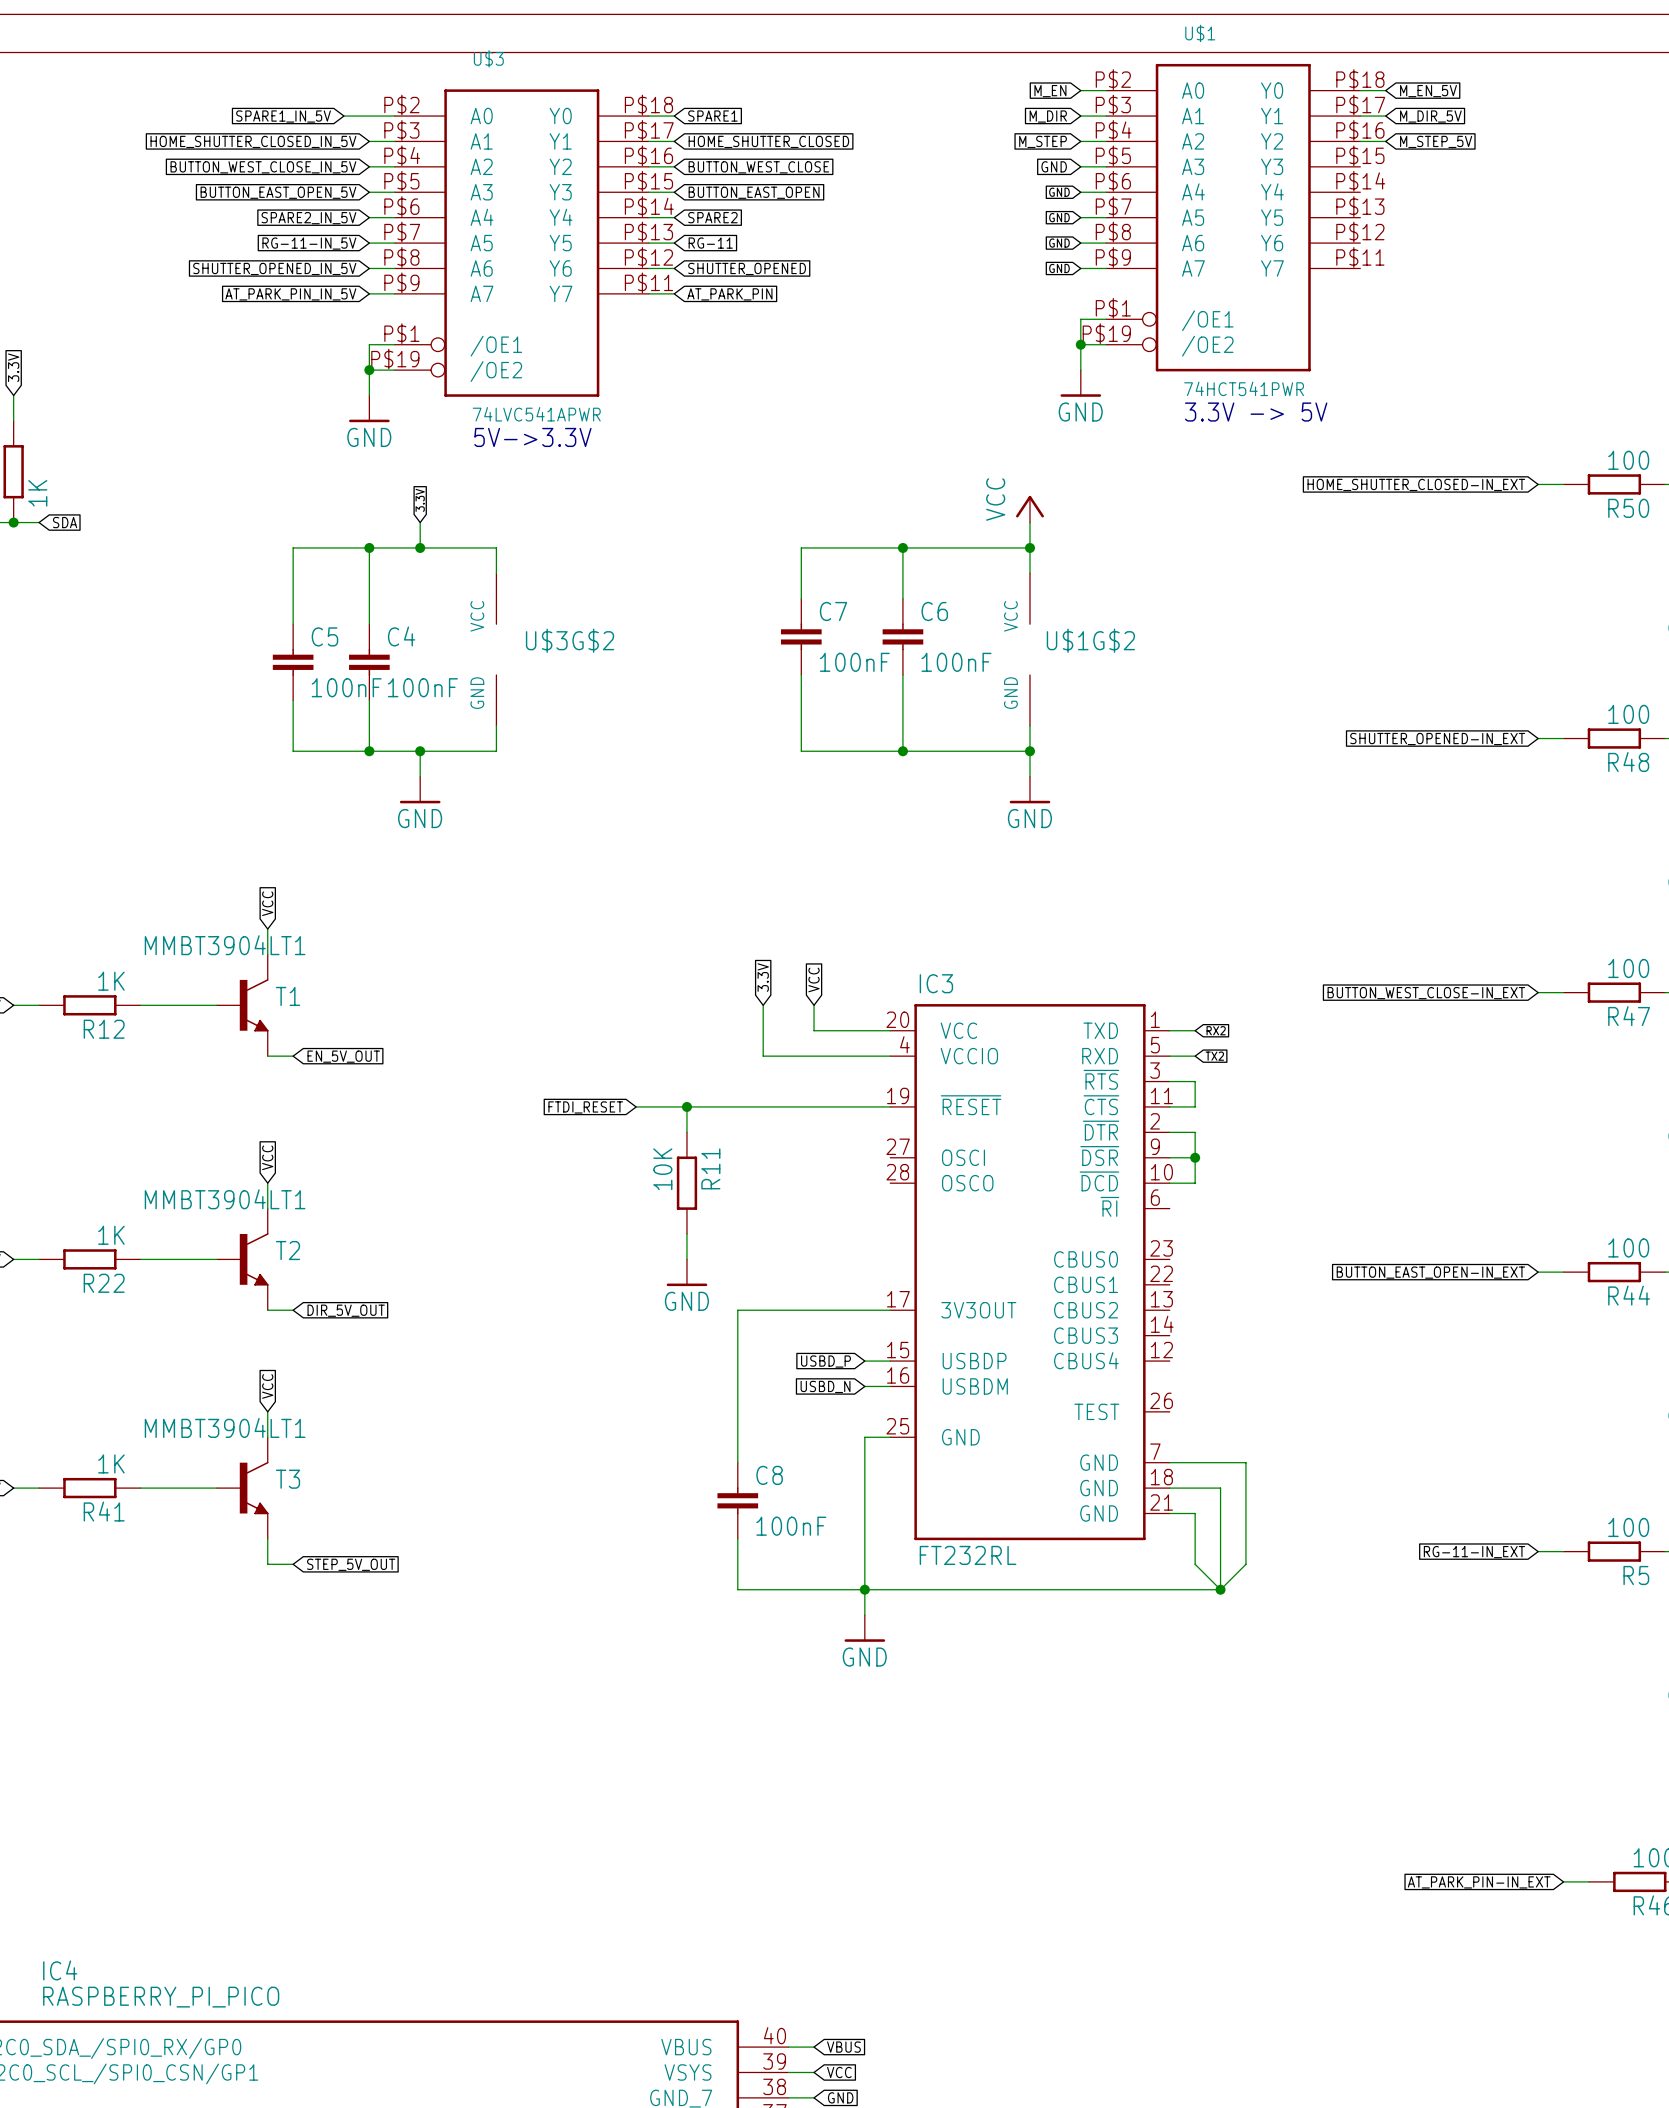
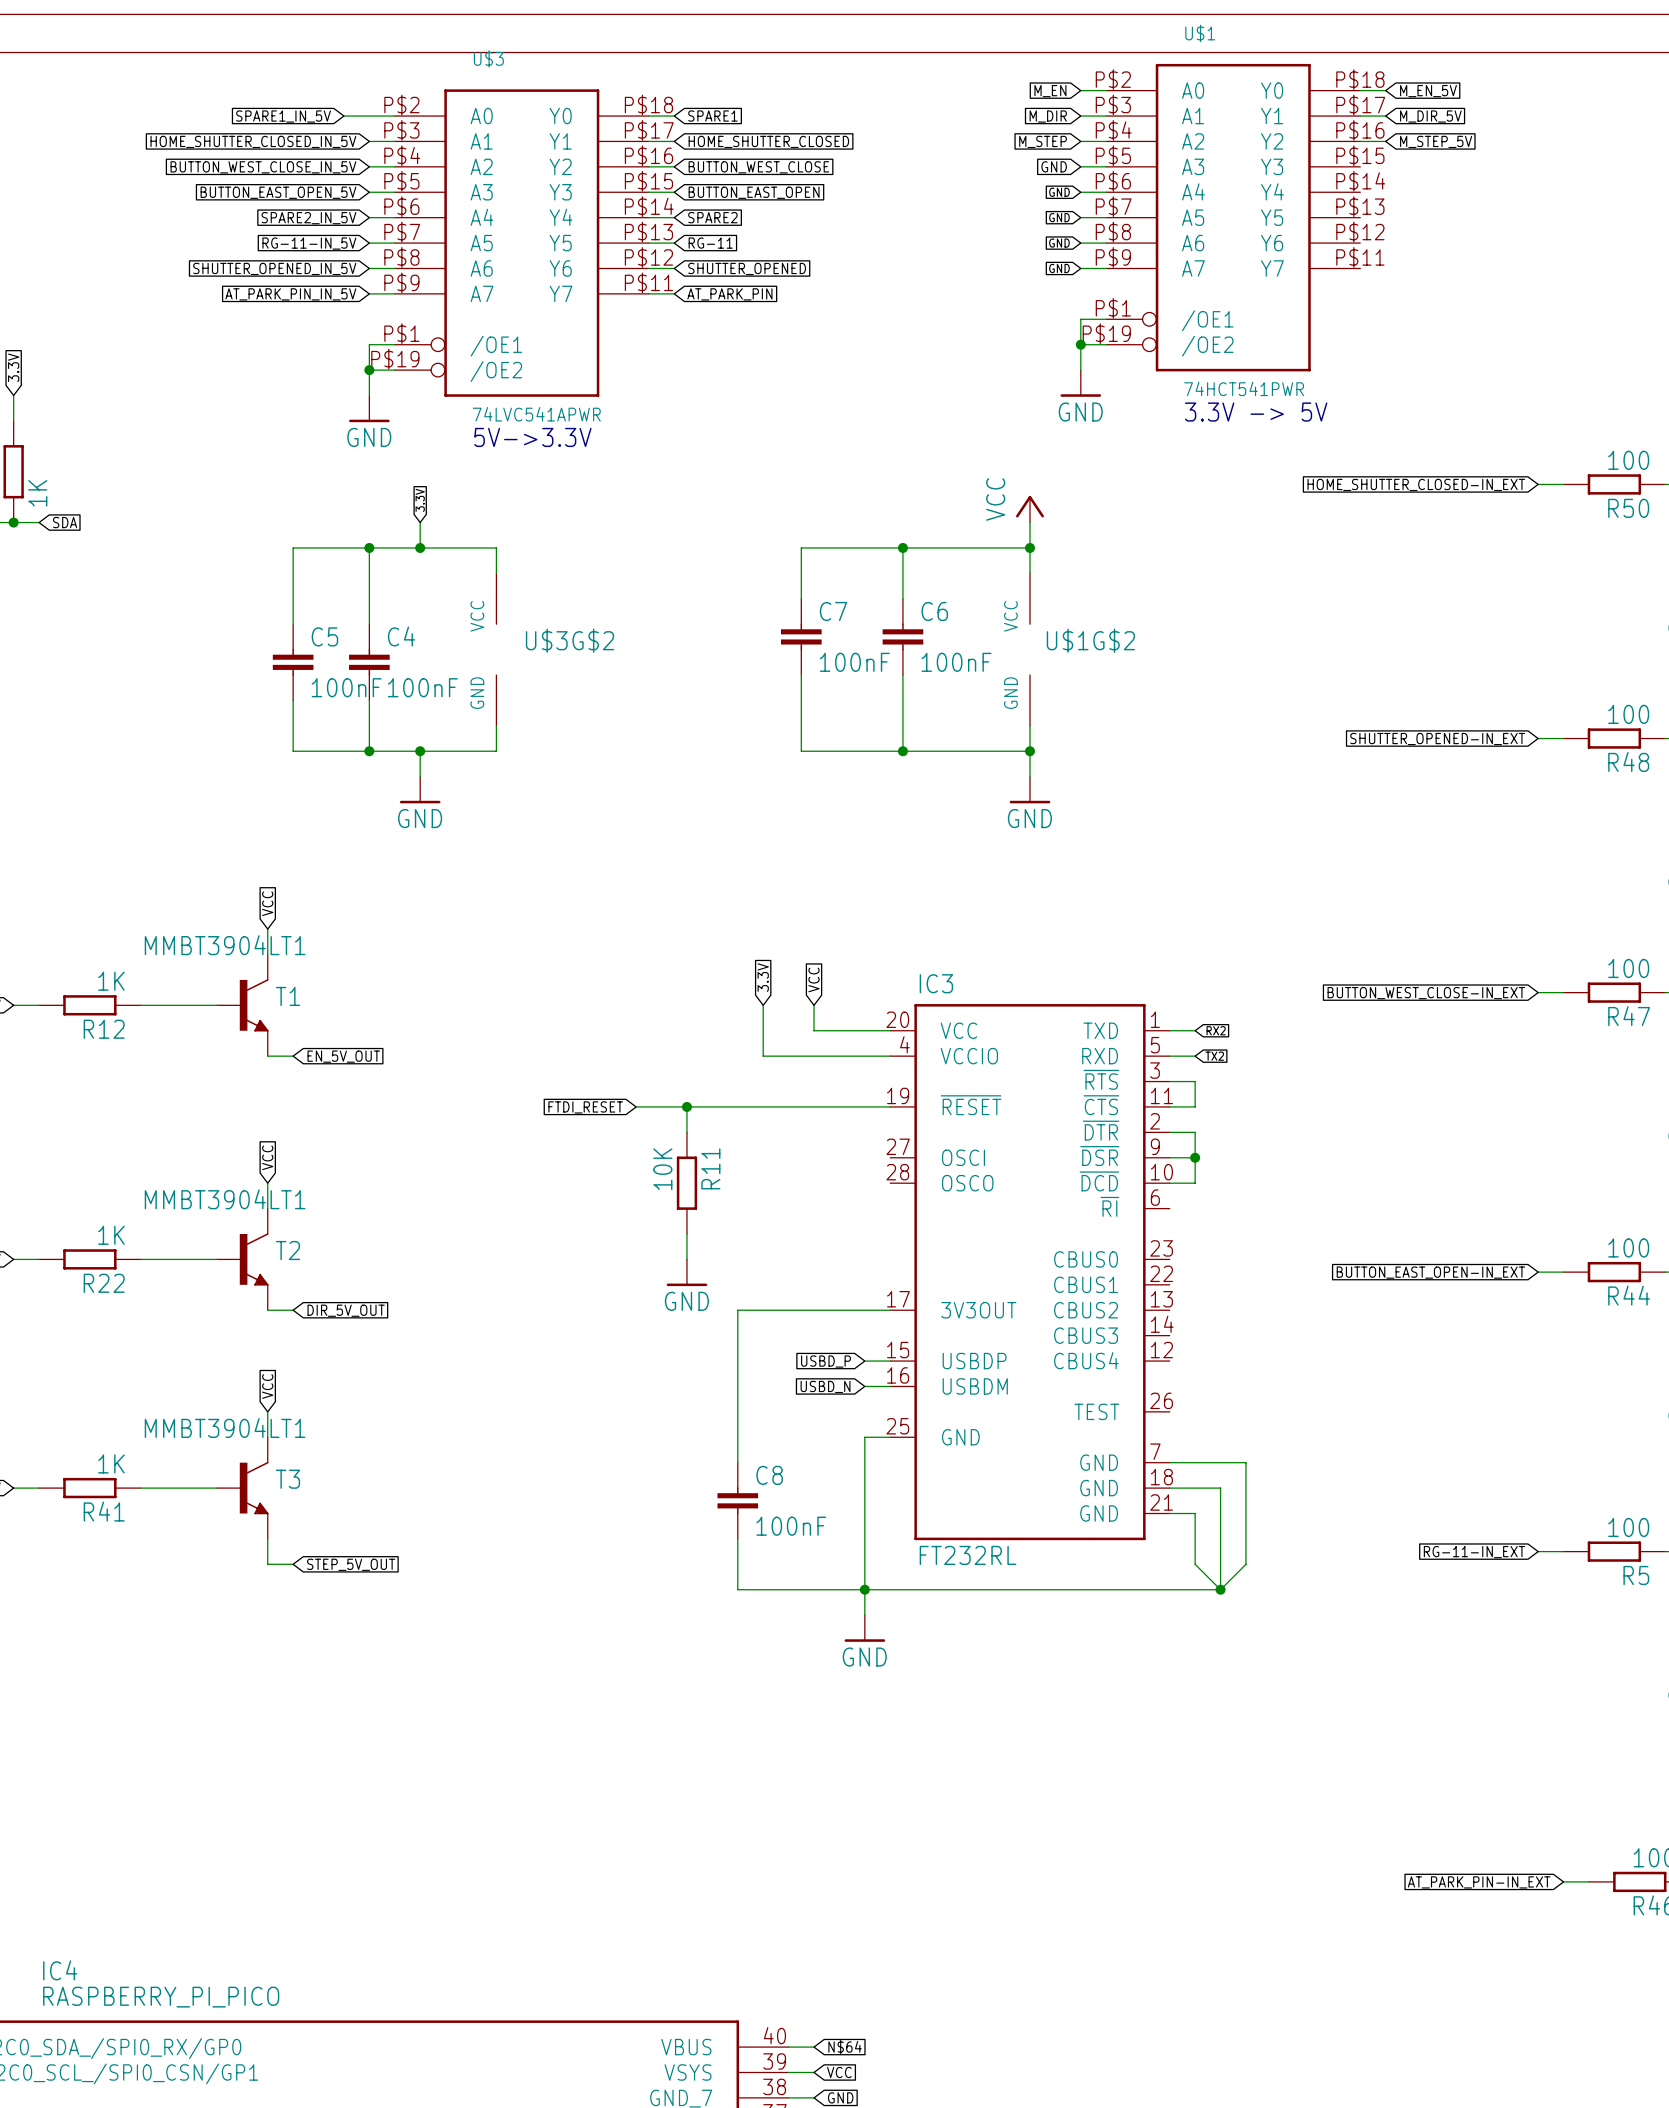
global label: VBUS (843, 2047) -> N$64 (845, 2047)

